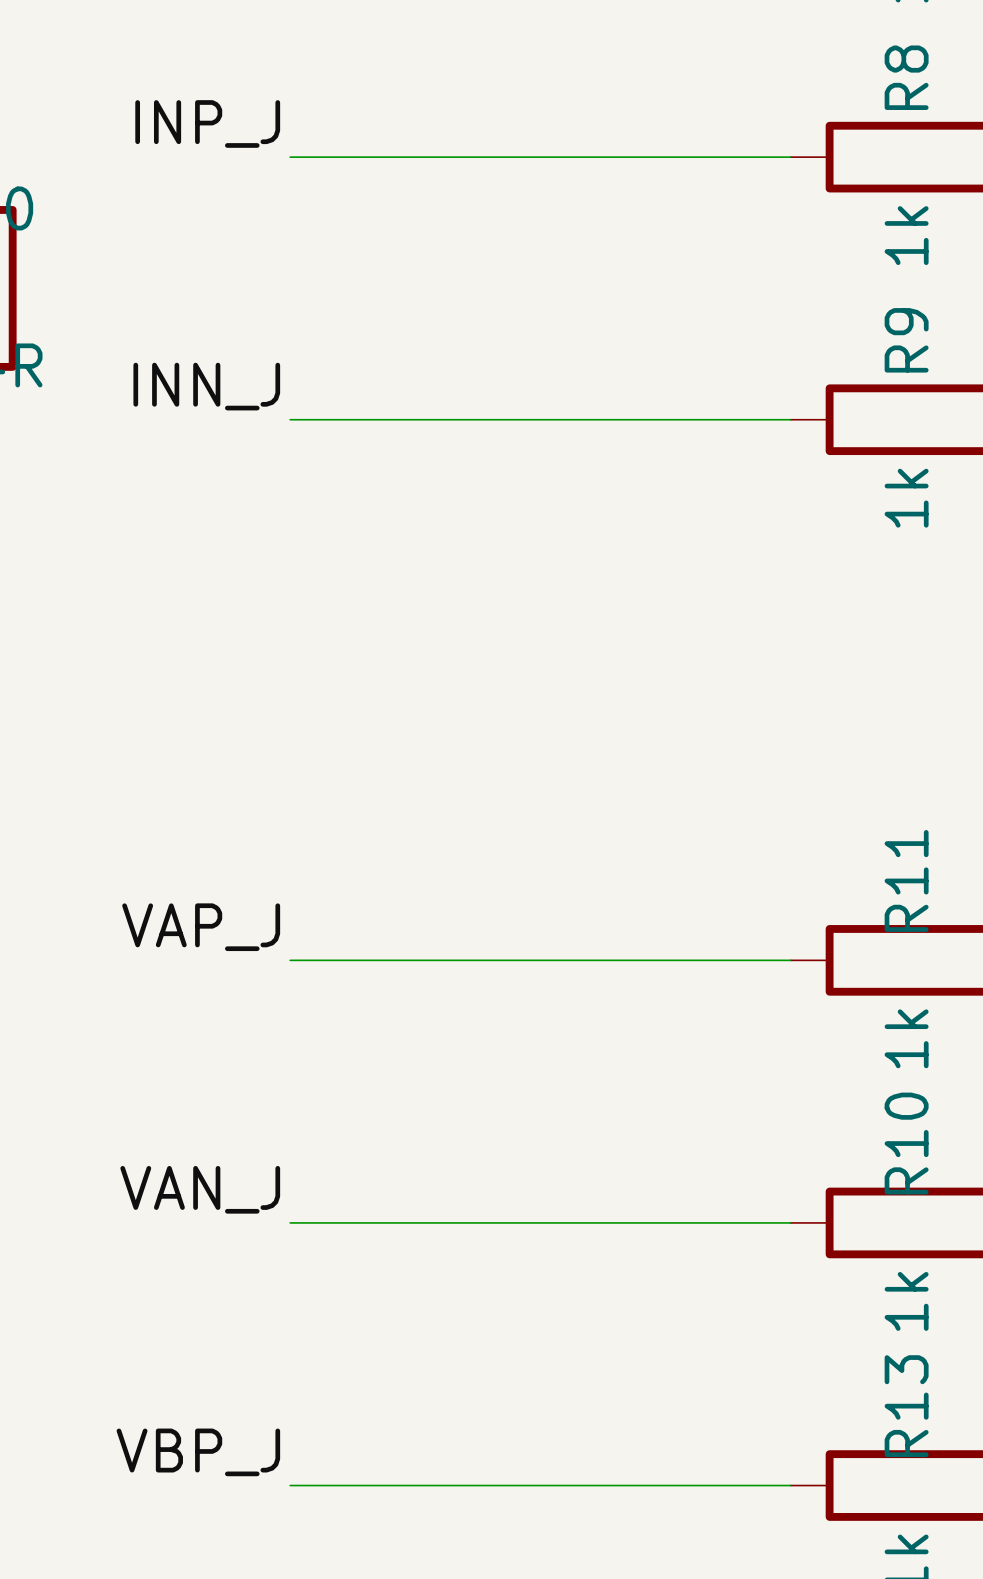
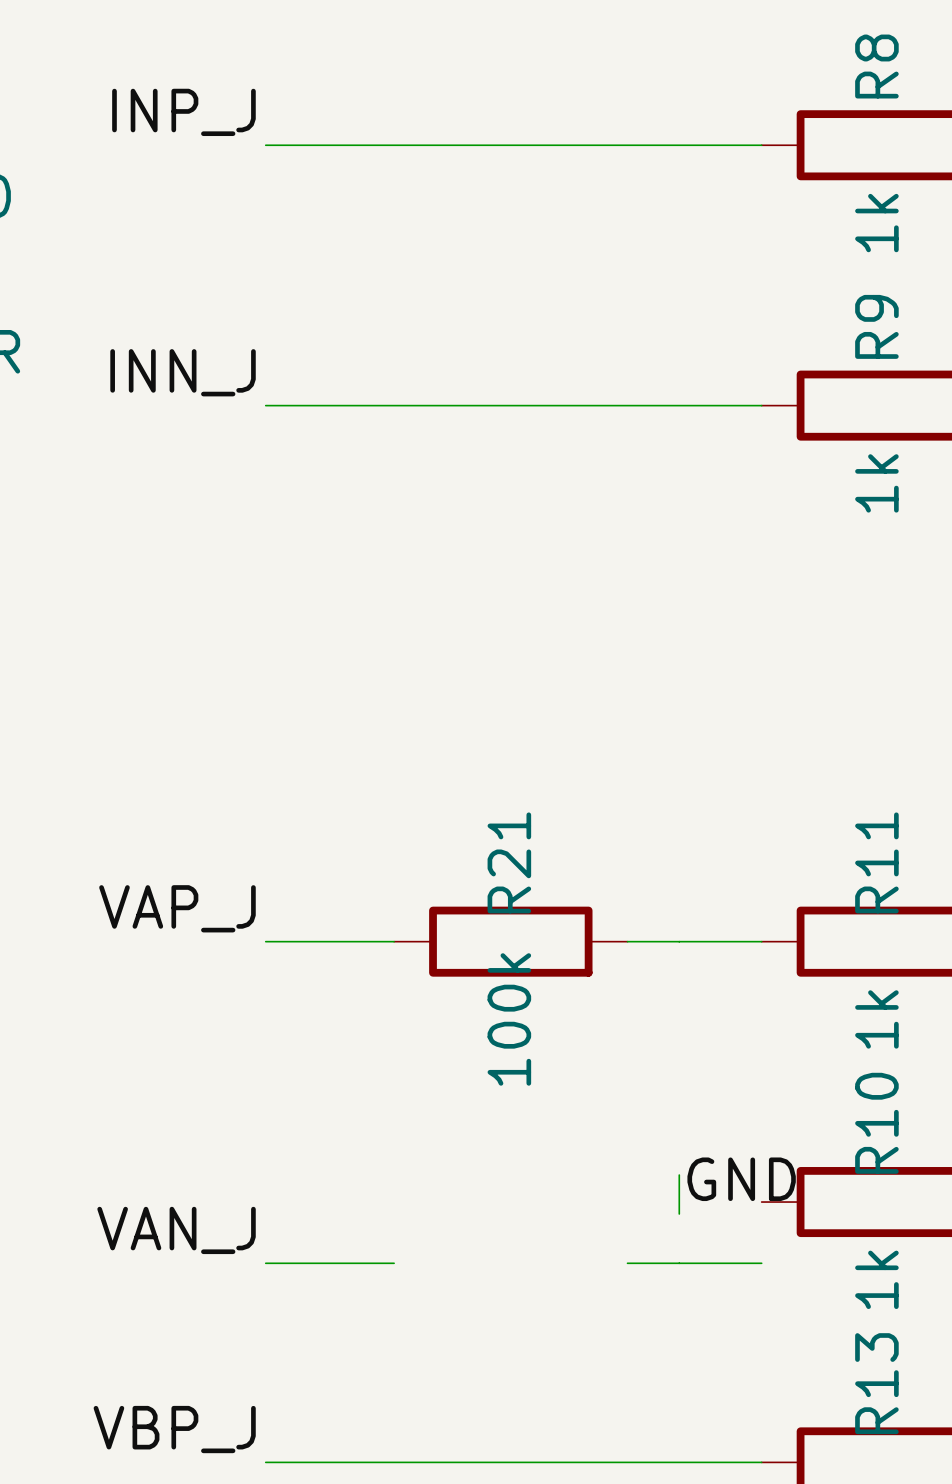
wire: (419, 960) (655, 960) -> none
R21: none -> 100k (510, 941)
label position: VAN_J (200, 1189) -> VAN_J (176, 1230)
wire: none -> (679, 1175) (679, 1213)
label: none -> GND (741, 1179)
wire: (290, 1222) (790, 1222) -> none
wire: none -> (265, 1263) (394, 1263)
wire: none -> (627, 1263) (761, 1263)

